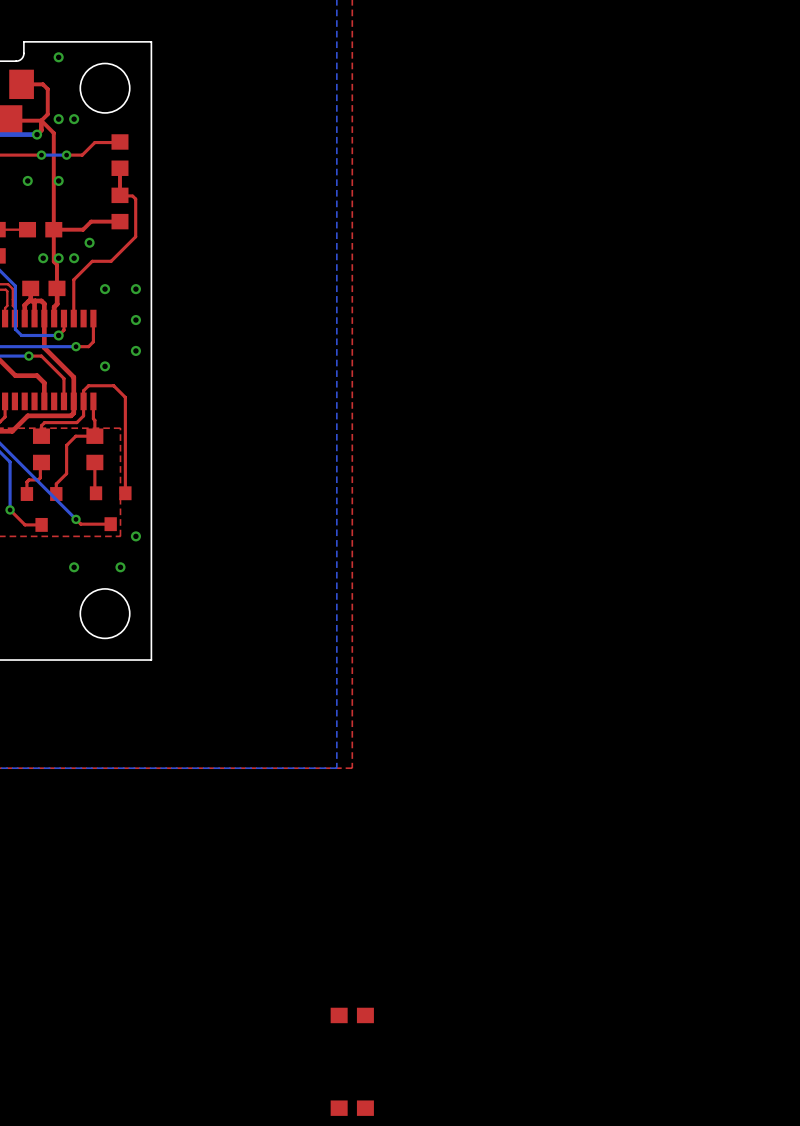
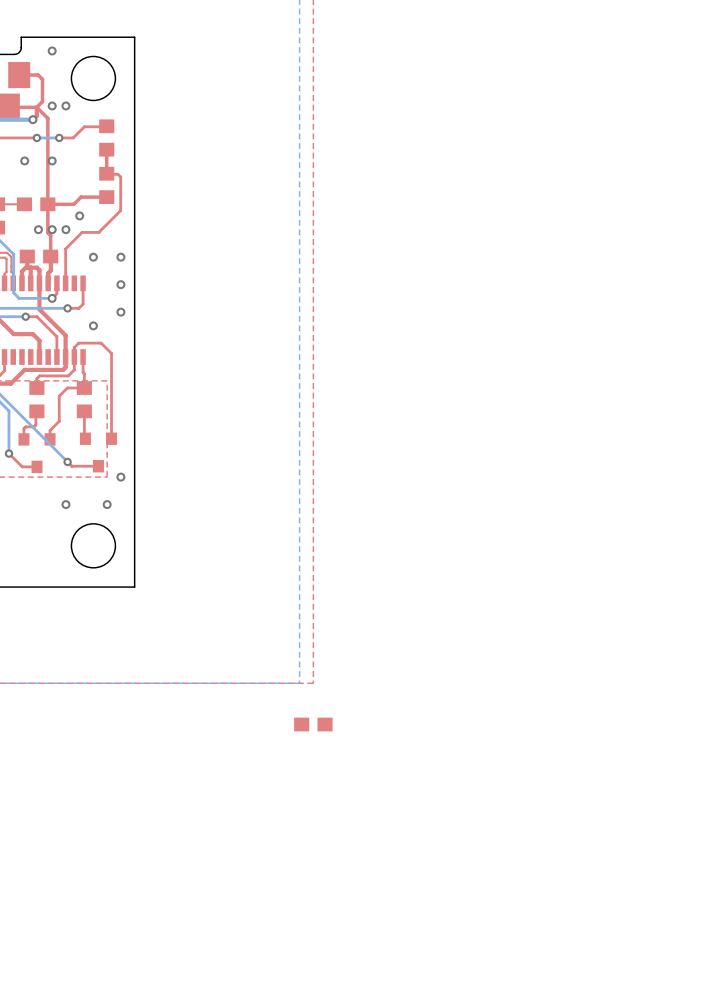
part: none -> (313, 724)
part: (352, 1015) -> none
part: (352, 1108) -> none

